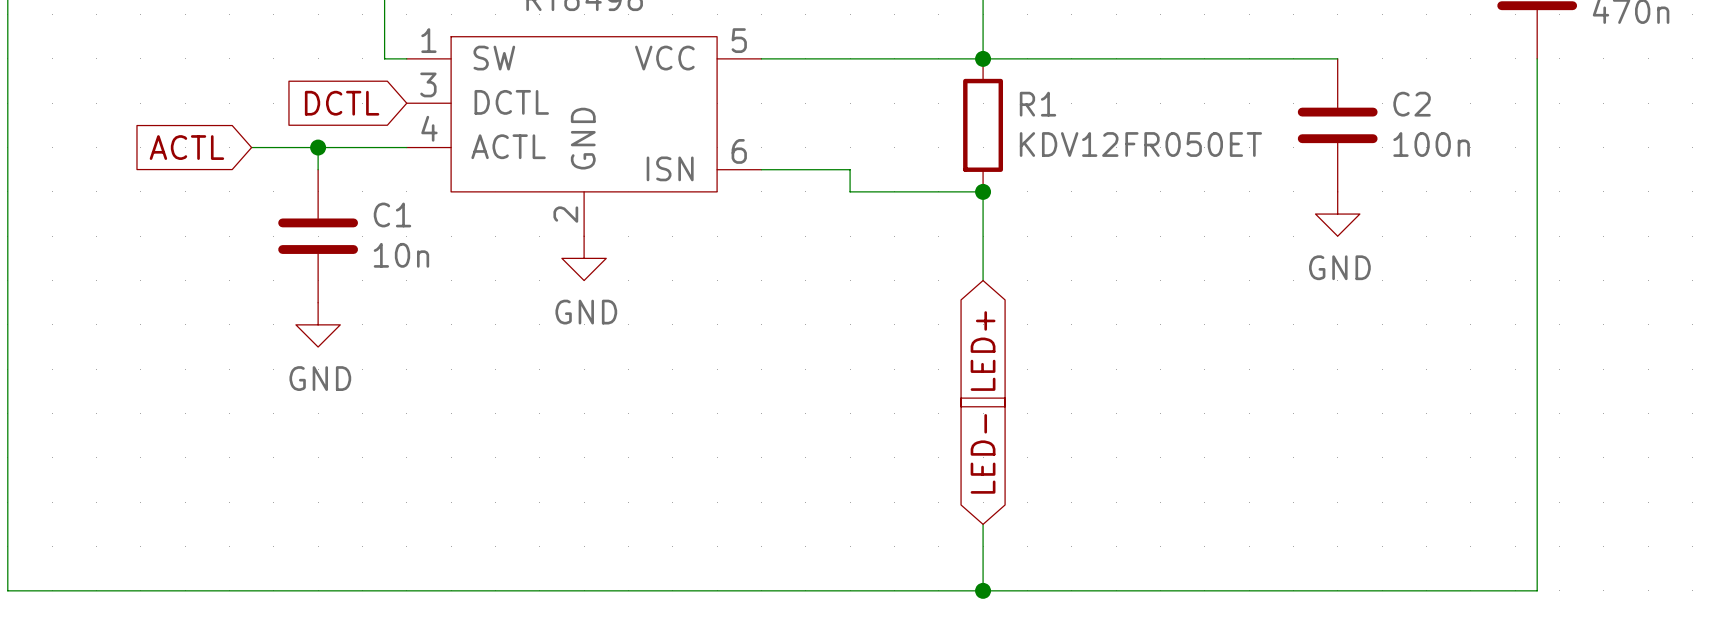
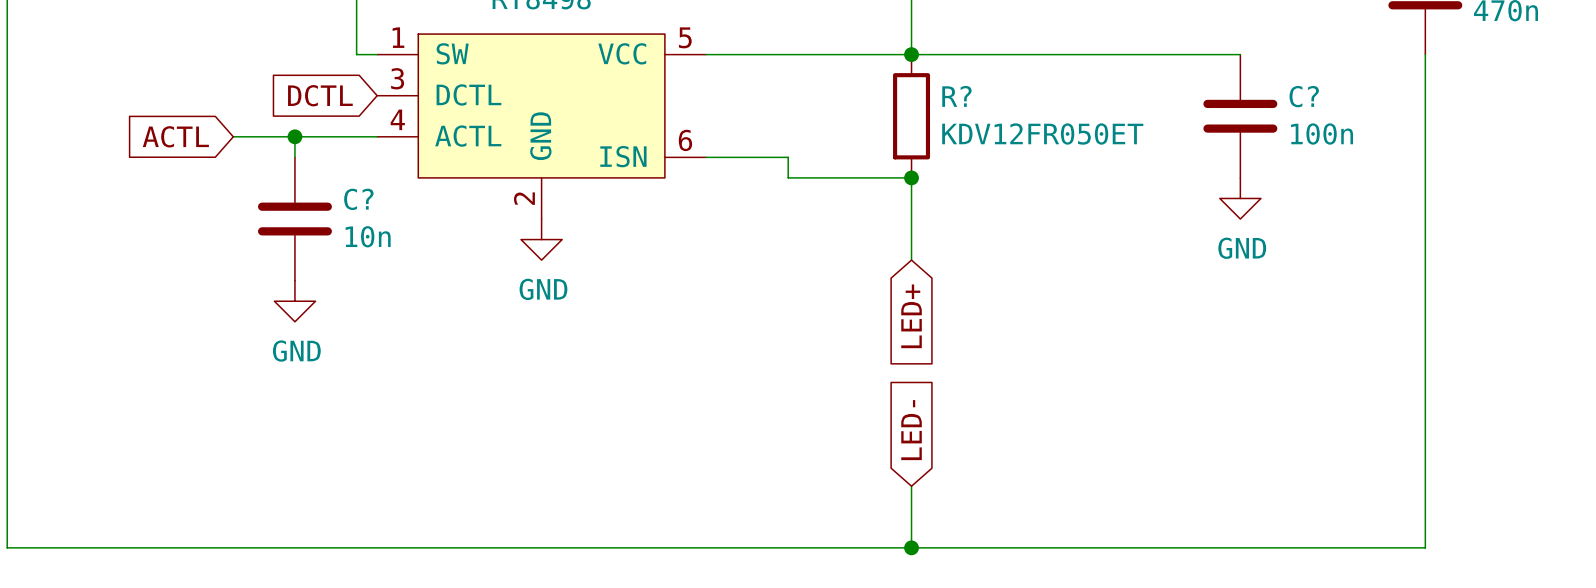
R1 name: R1 (1038, 104) -> R? (956, 96)
C2 name: C2 (1412, 104) -> C? (1304, 96)
C1 name: C1 (392, 214) -> C? (358, 199)

